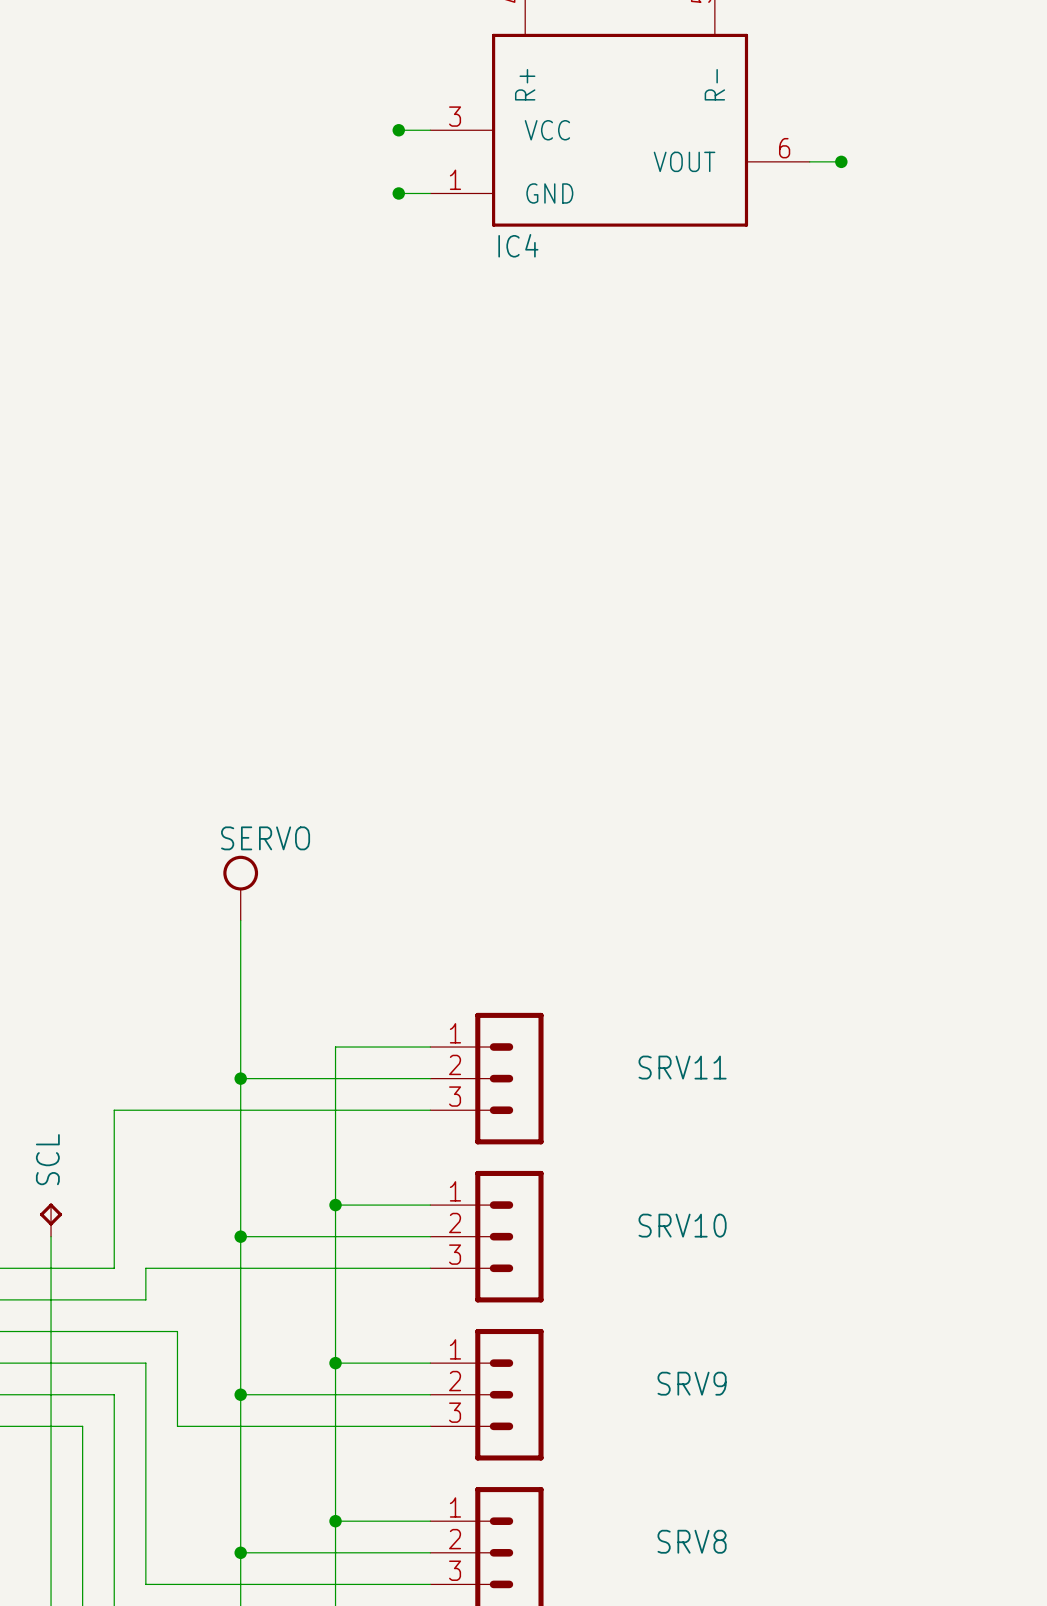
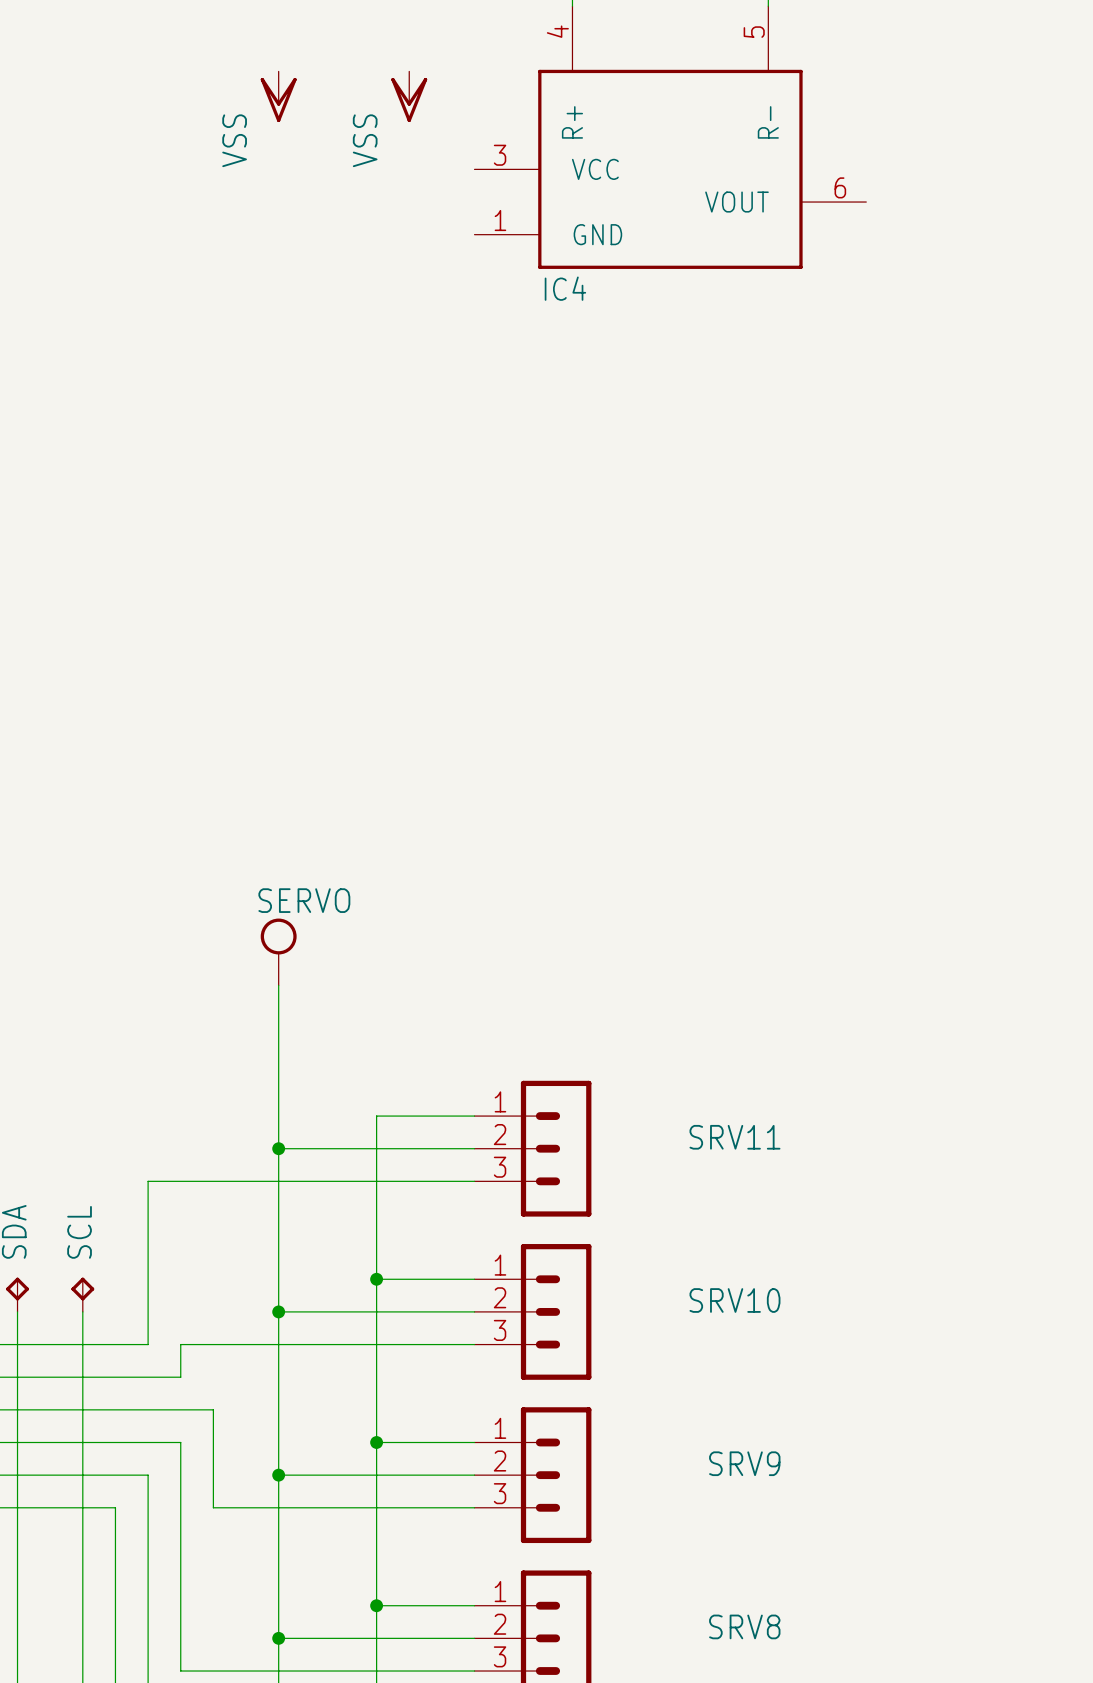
power symbol: none -> VSS (278, 96)
power symbol: none -> VSS (409, 96)
wire: (398, 130) (430, 130) -> none
junction: (398, 130) -> none
wire: (809, 161) (841, 161) -> none
junction: (841, 161) -> none
wire: (398, 193) (430, 193) -> none
junction: (398, 193) -> none

